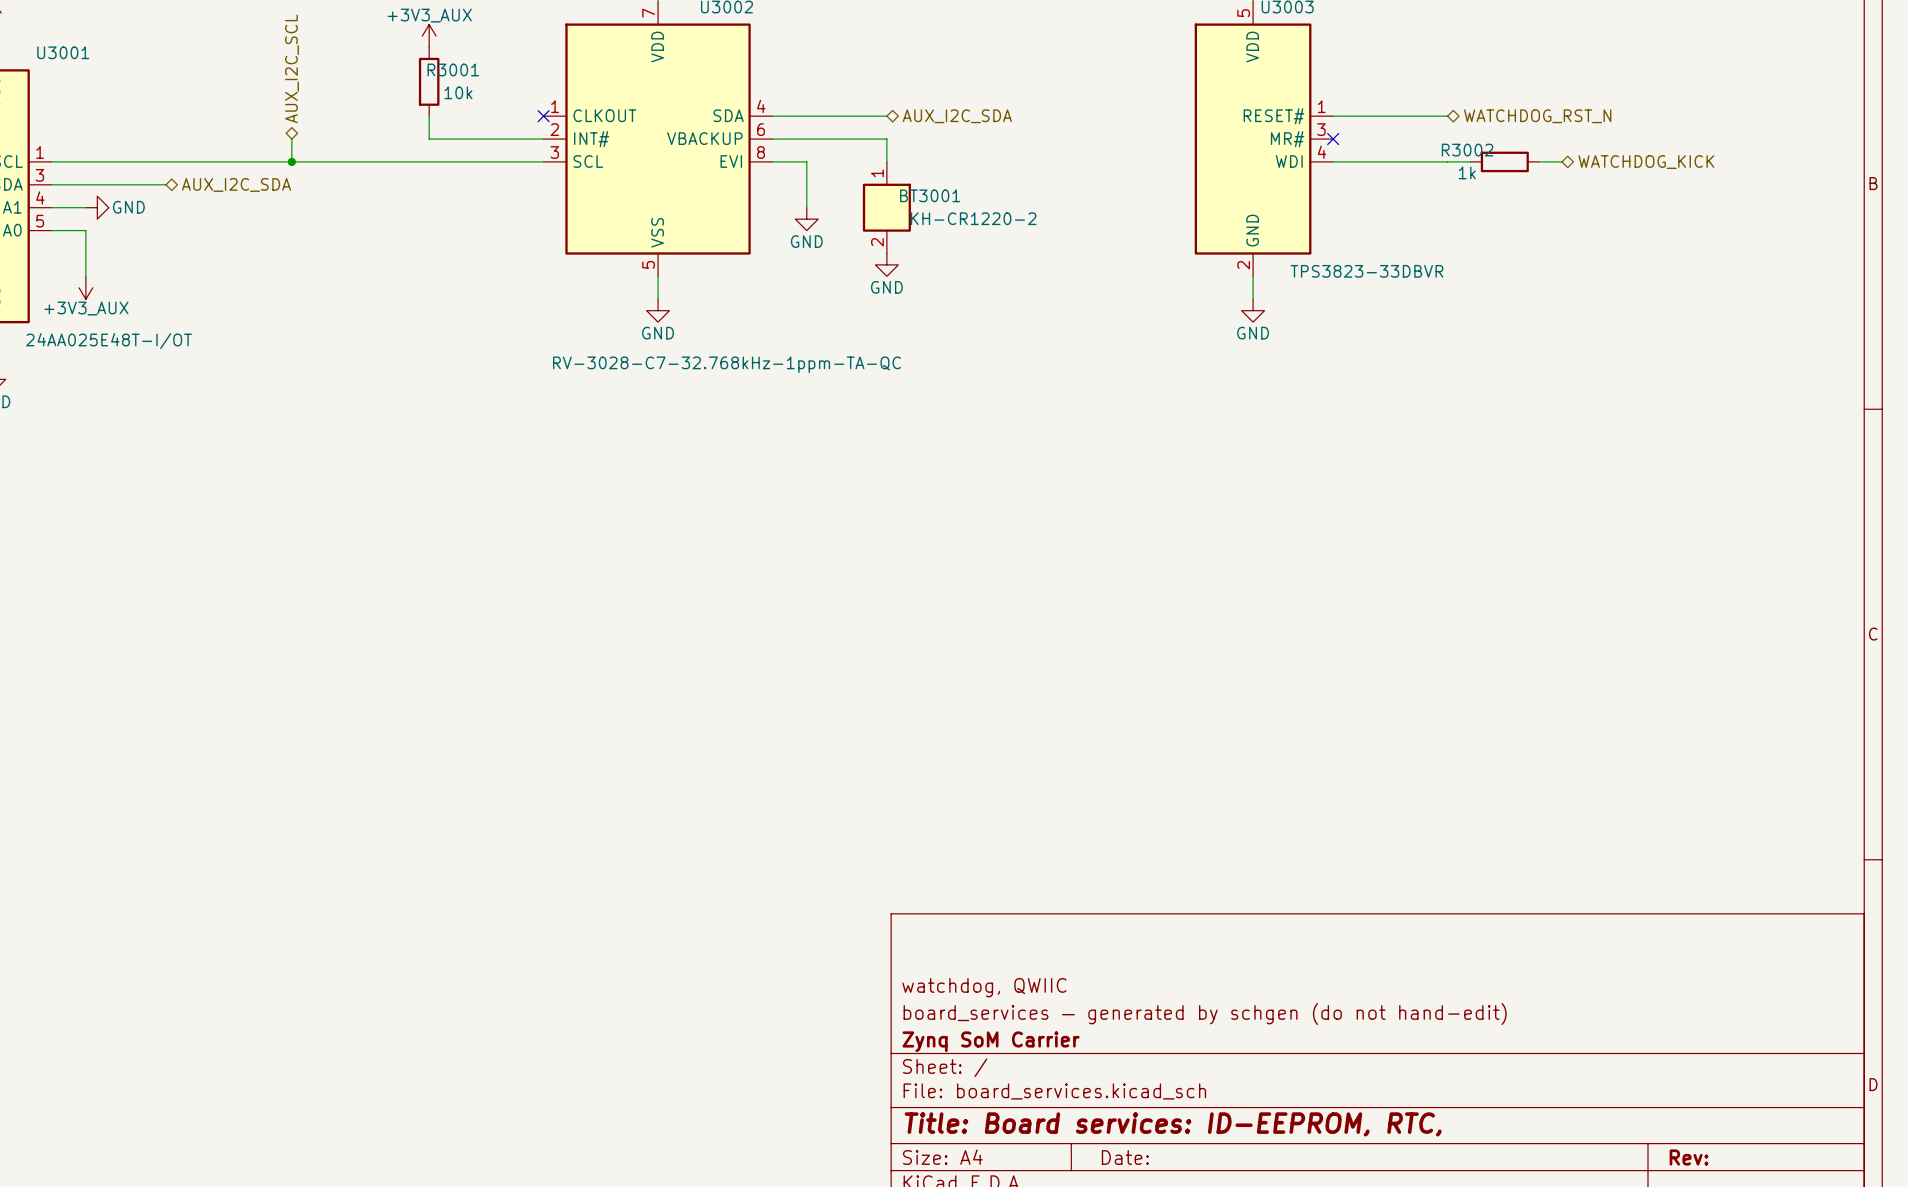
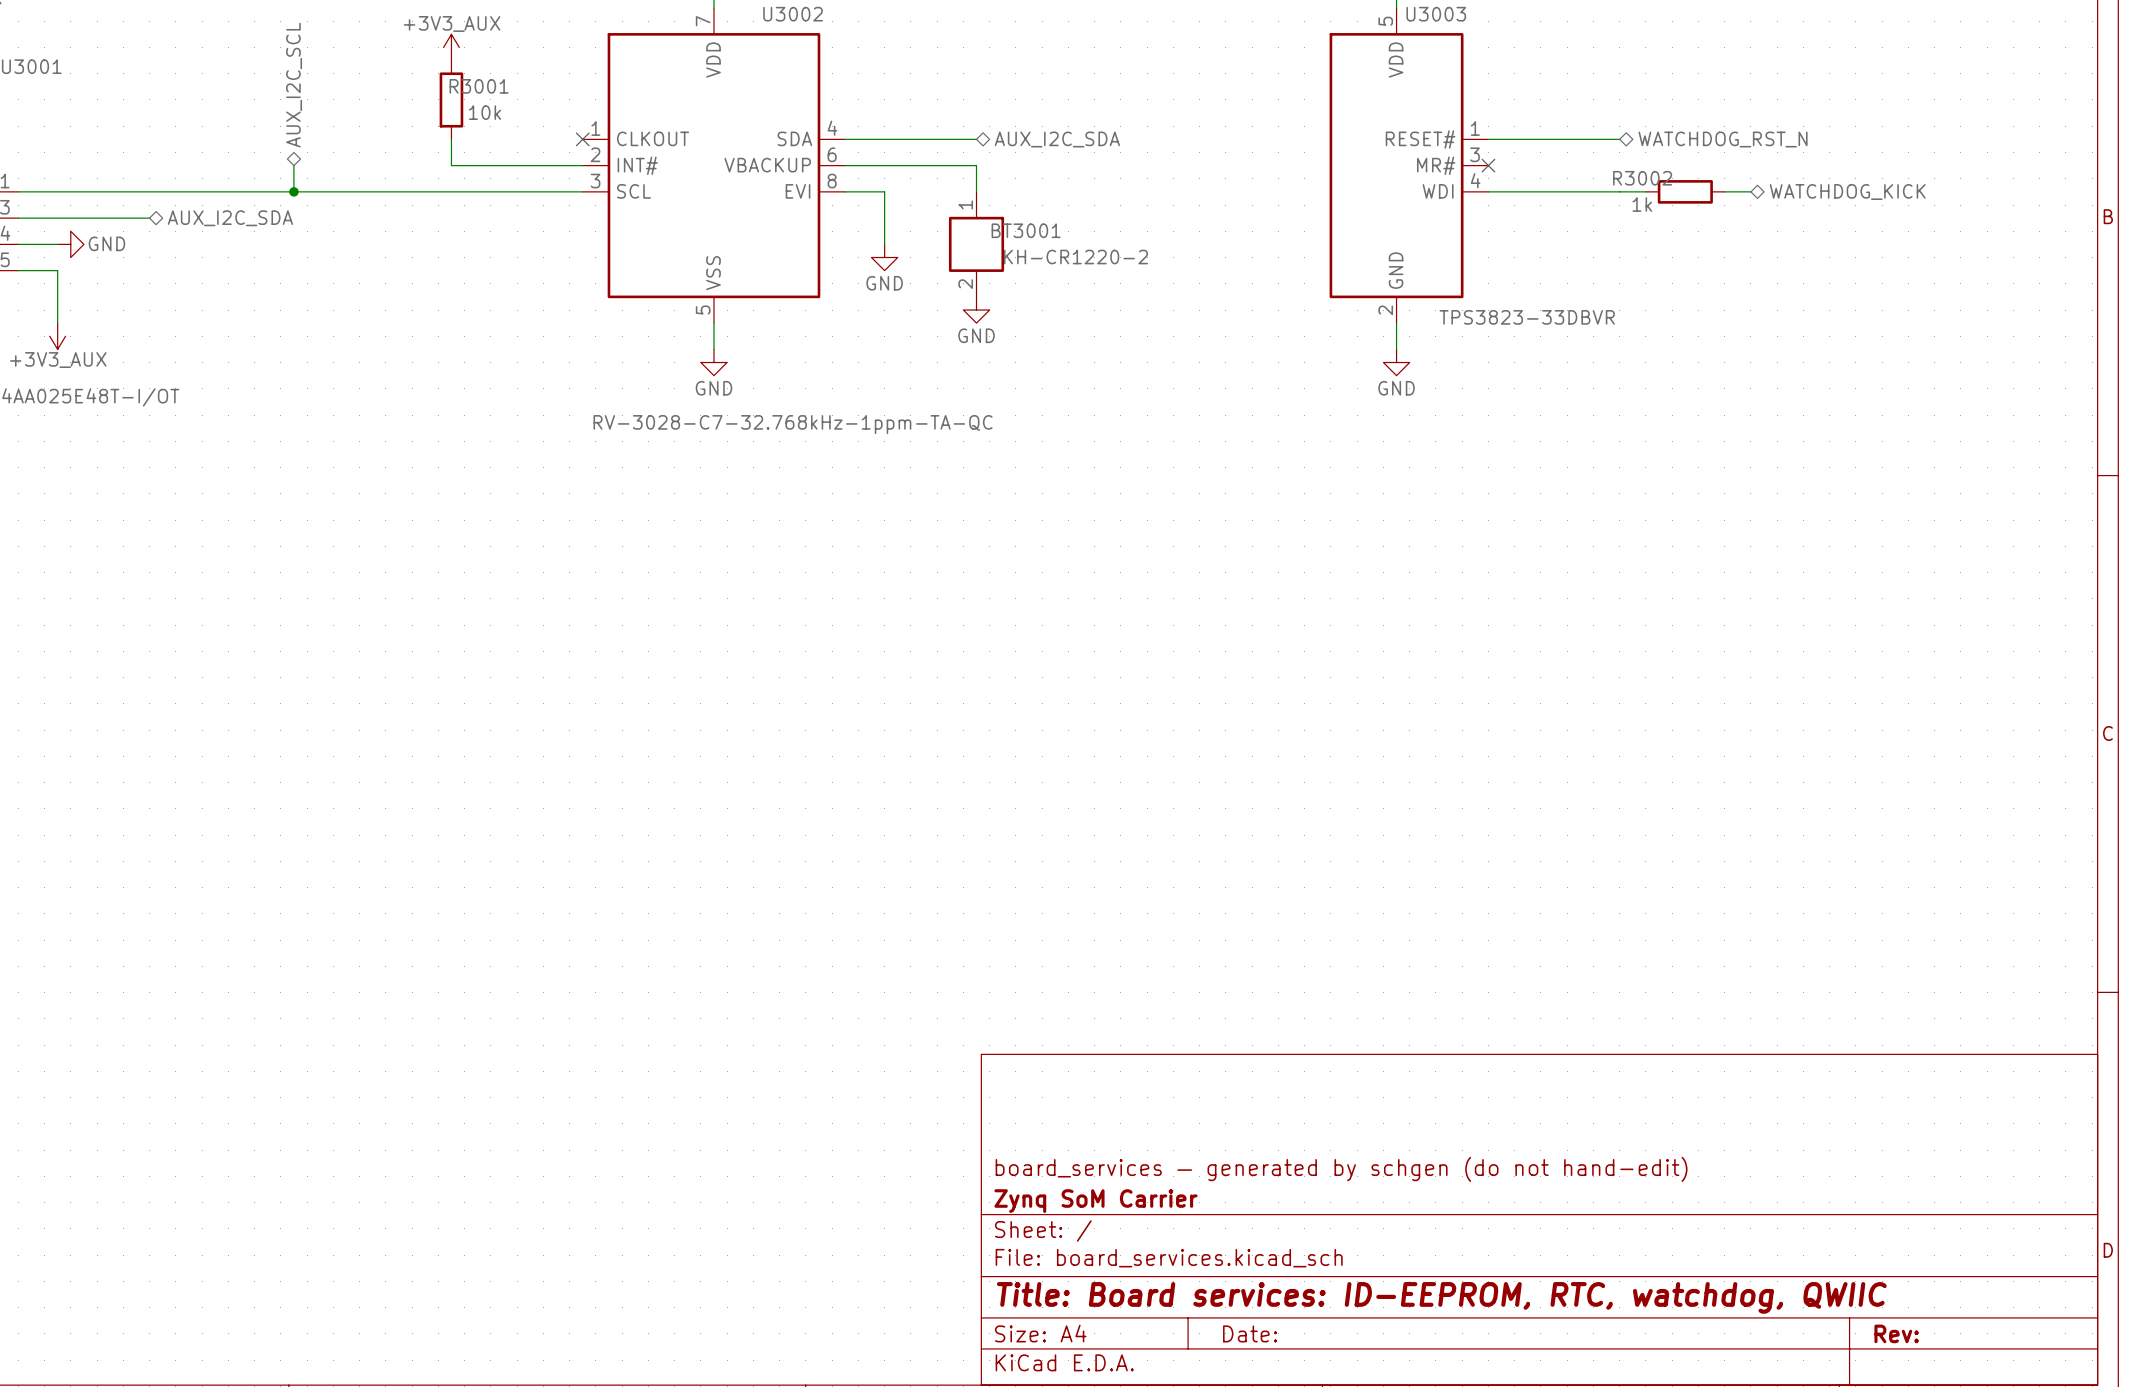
title block: watchdog, QWIIC (984, 987) -> none
title block: Title: Board services: ID-EEPROM, RTC, (1173, 1124) -> Title: Board services: ID-EEPROM, RTC, watchdog, QWIIC (1441, 1297)

